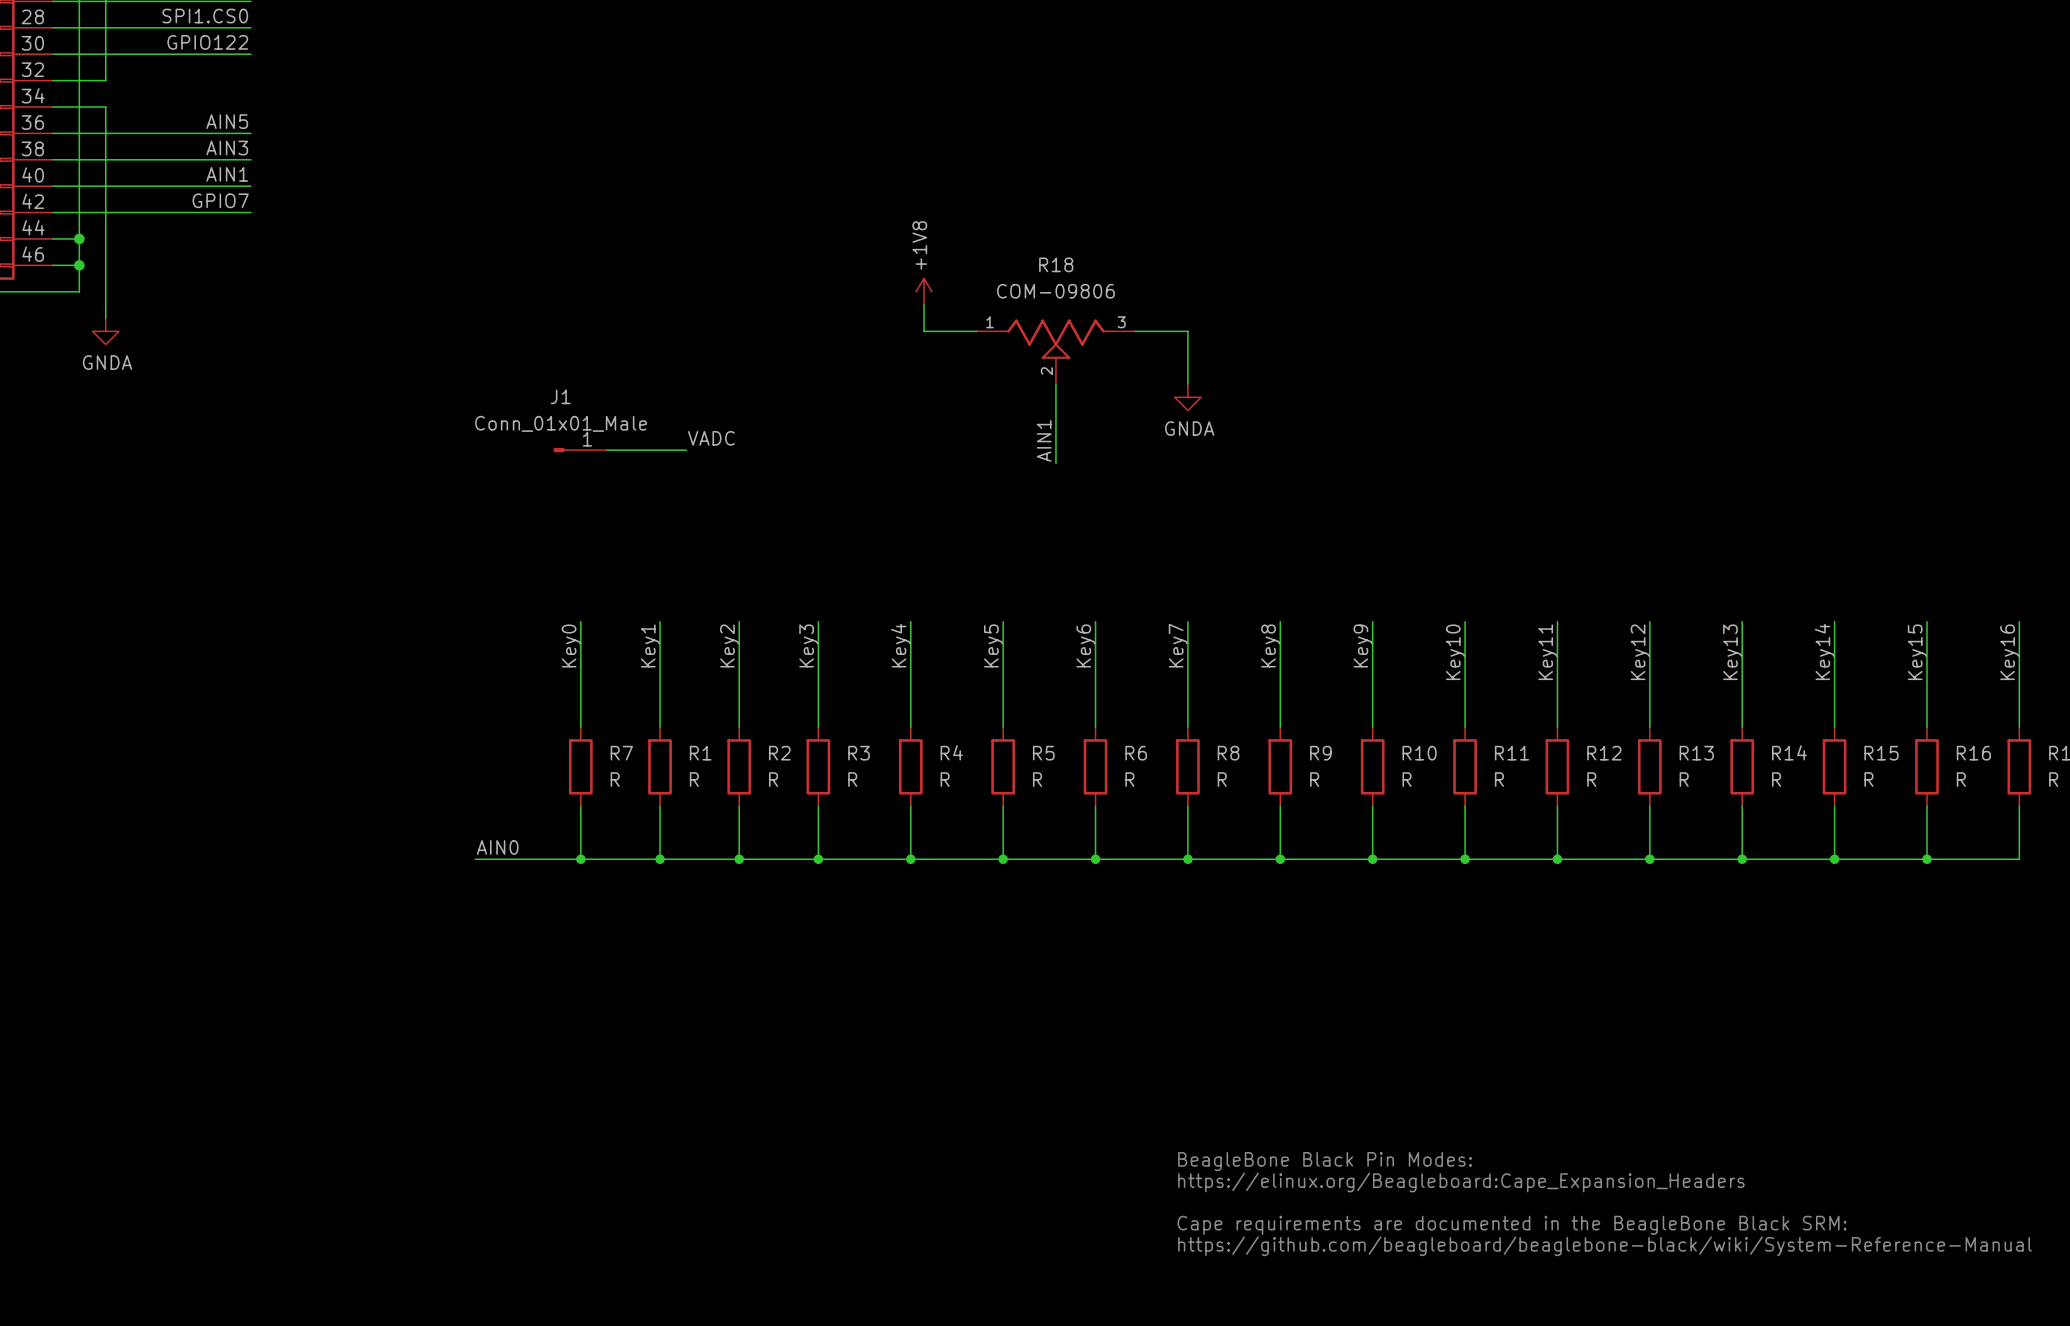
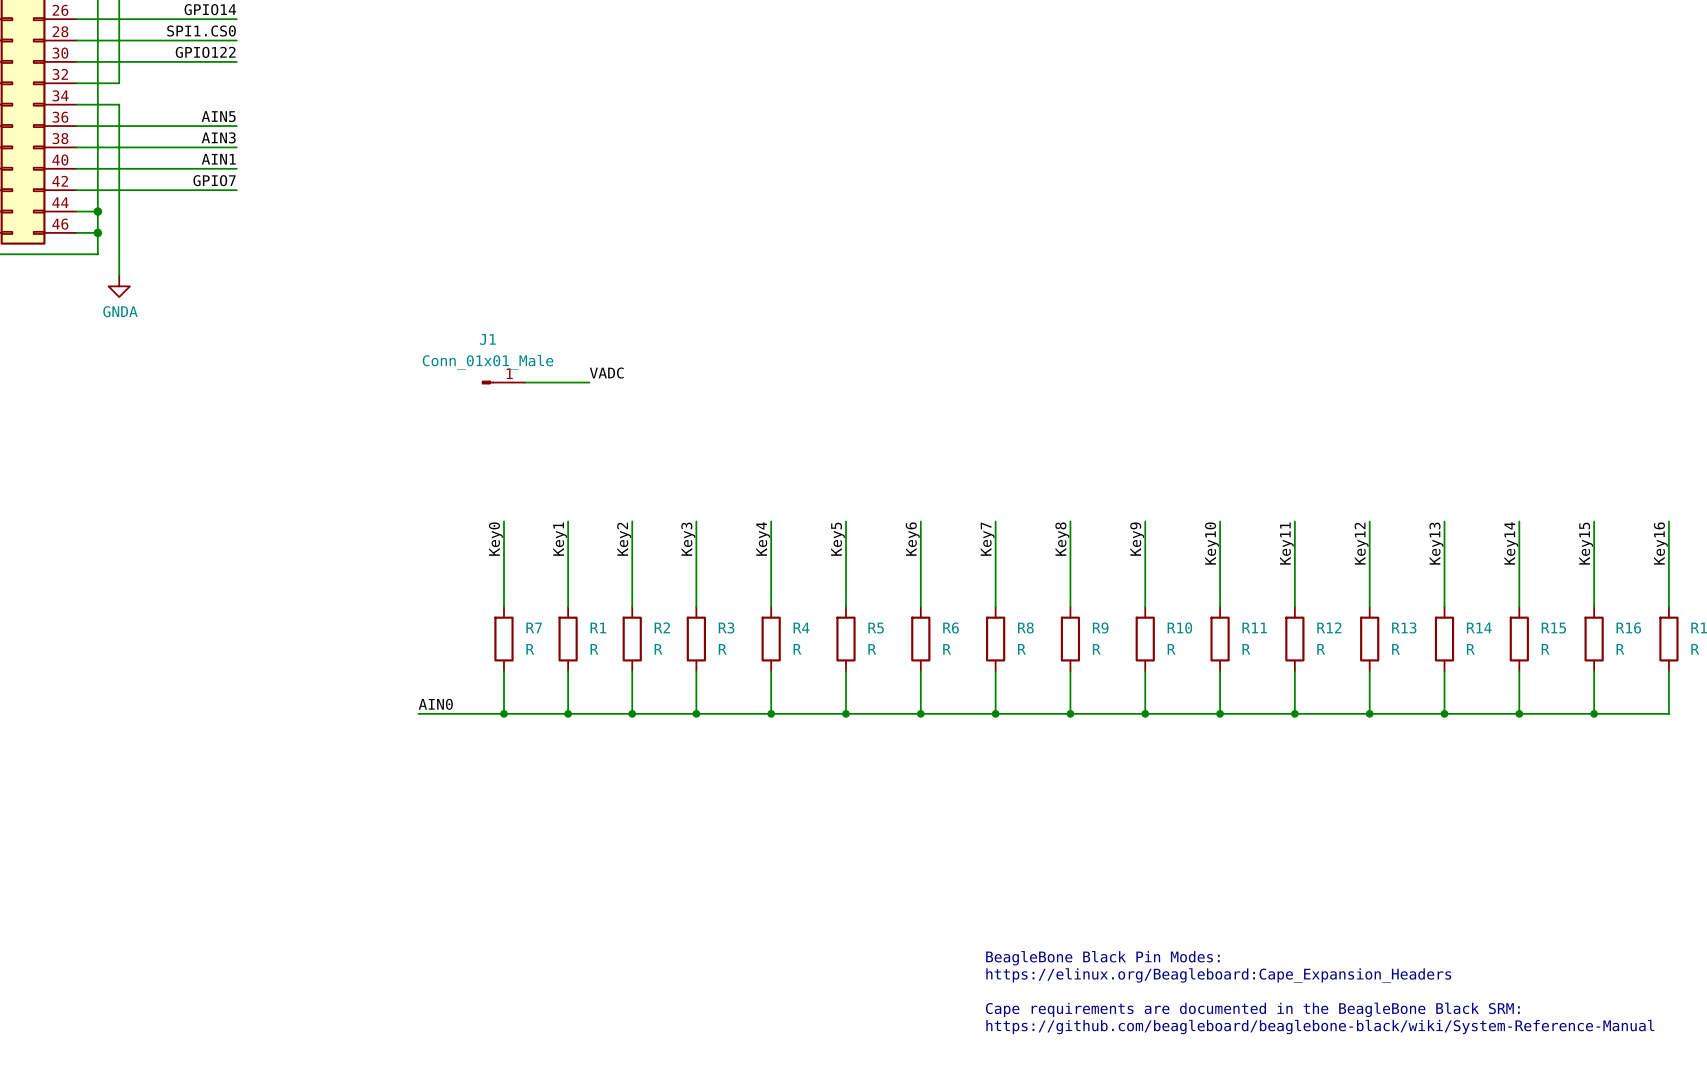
power symbol: +1V8 (923, 291) -> none
wire: (923, 304) (923, 331) (976, 331) -> none
wire: (1135, 331) (1187, 331) (1187, 384) -> none
R18: COM-09806 (1055, 351) -> none
wire: (1055, 384) (1055, 463) -> none
power symbol: GNDA (1187, 397) -> none
label: AIN1 (1044, 440) -> none

